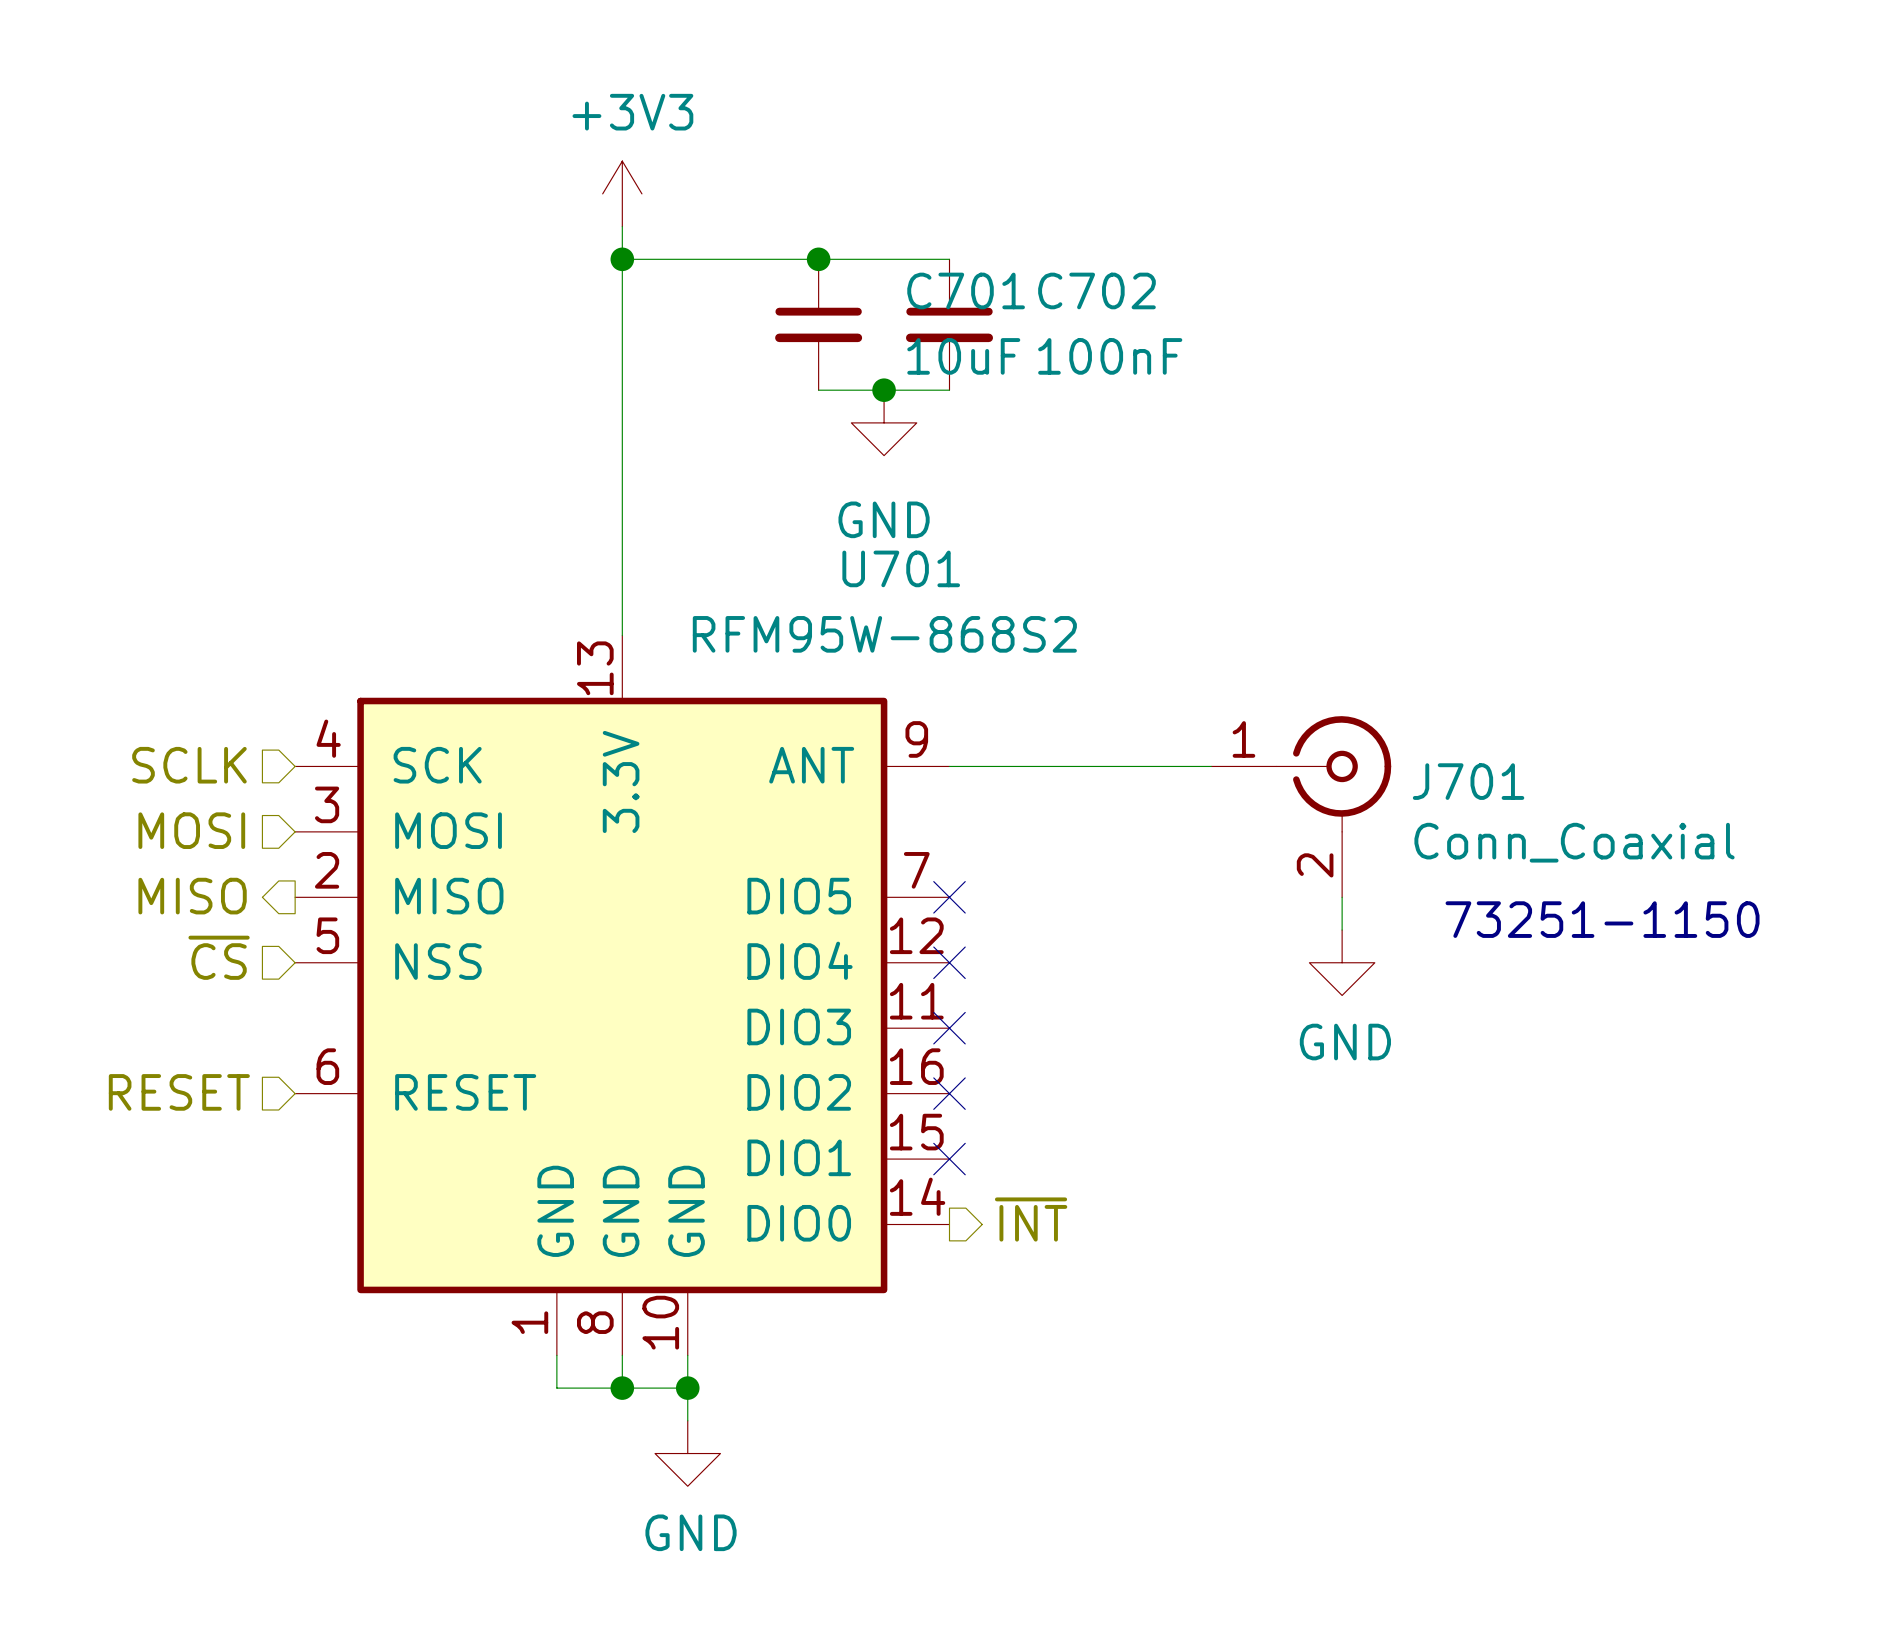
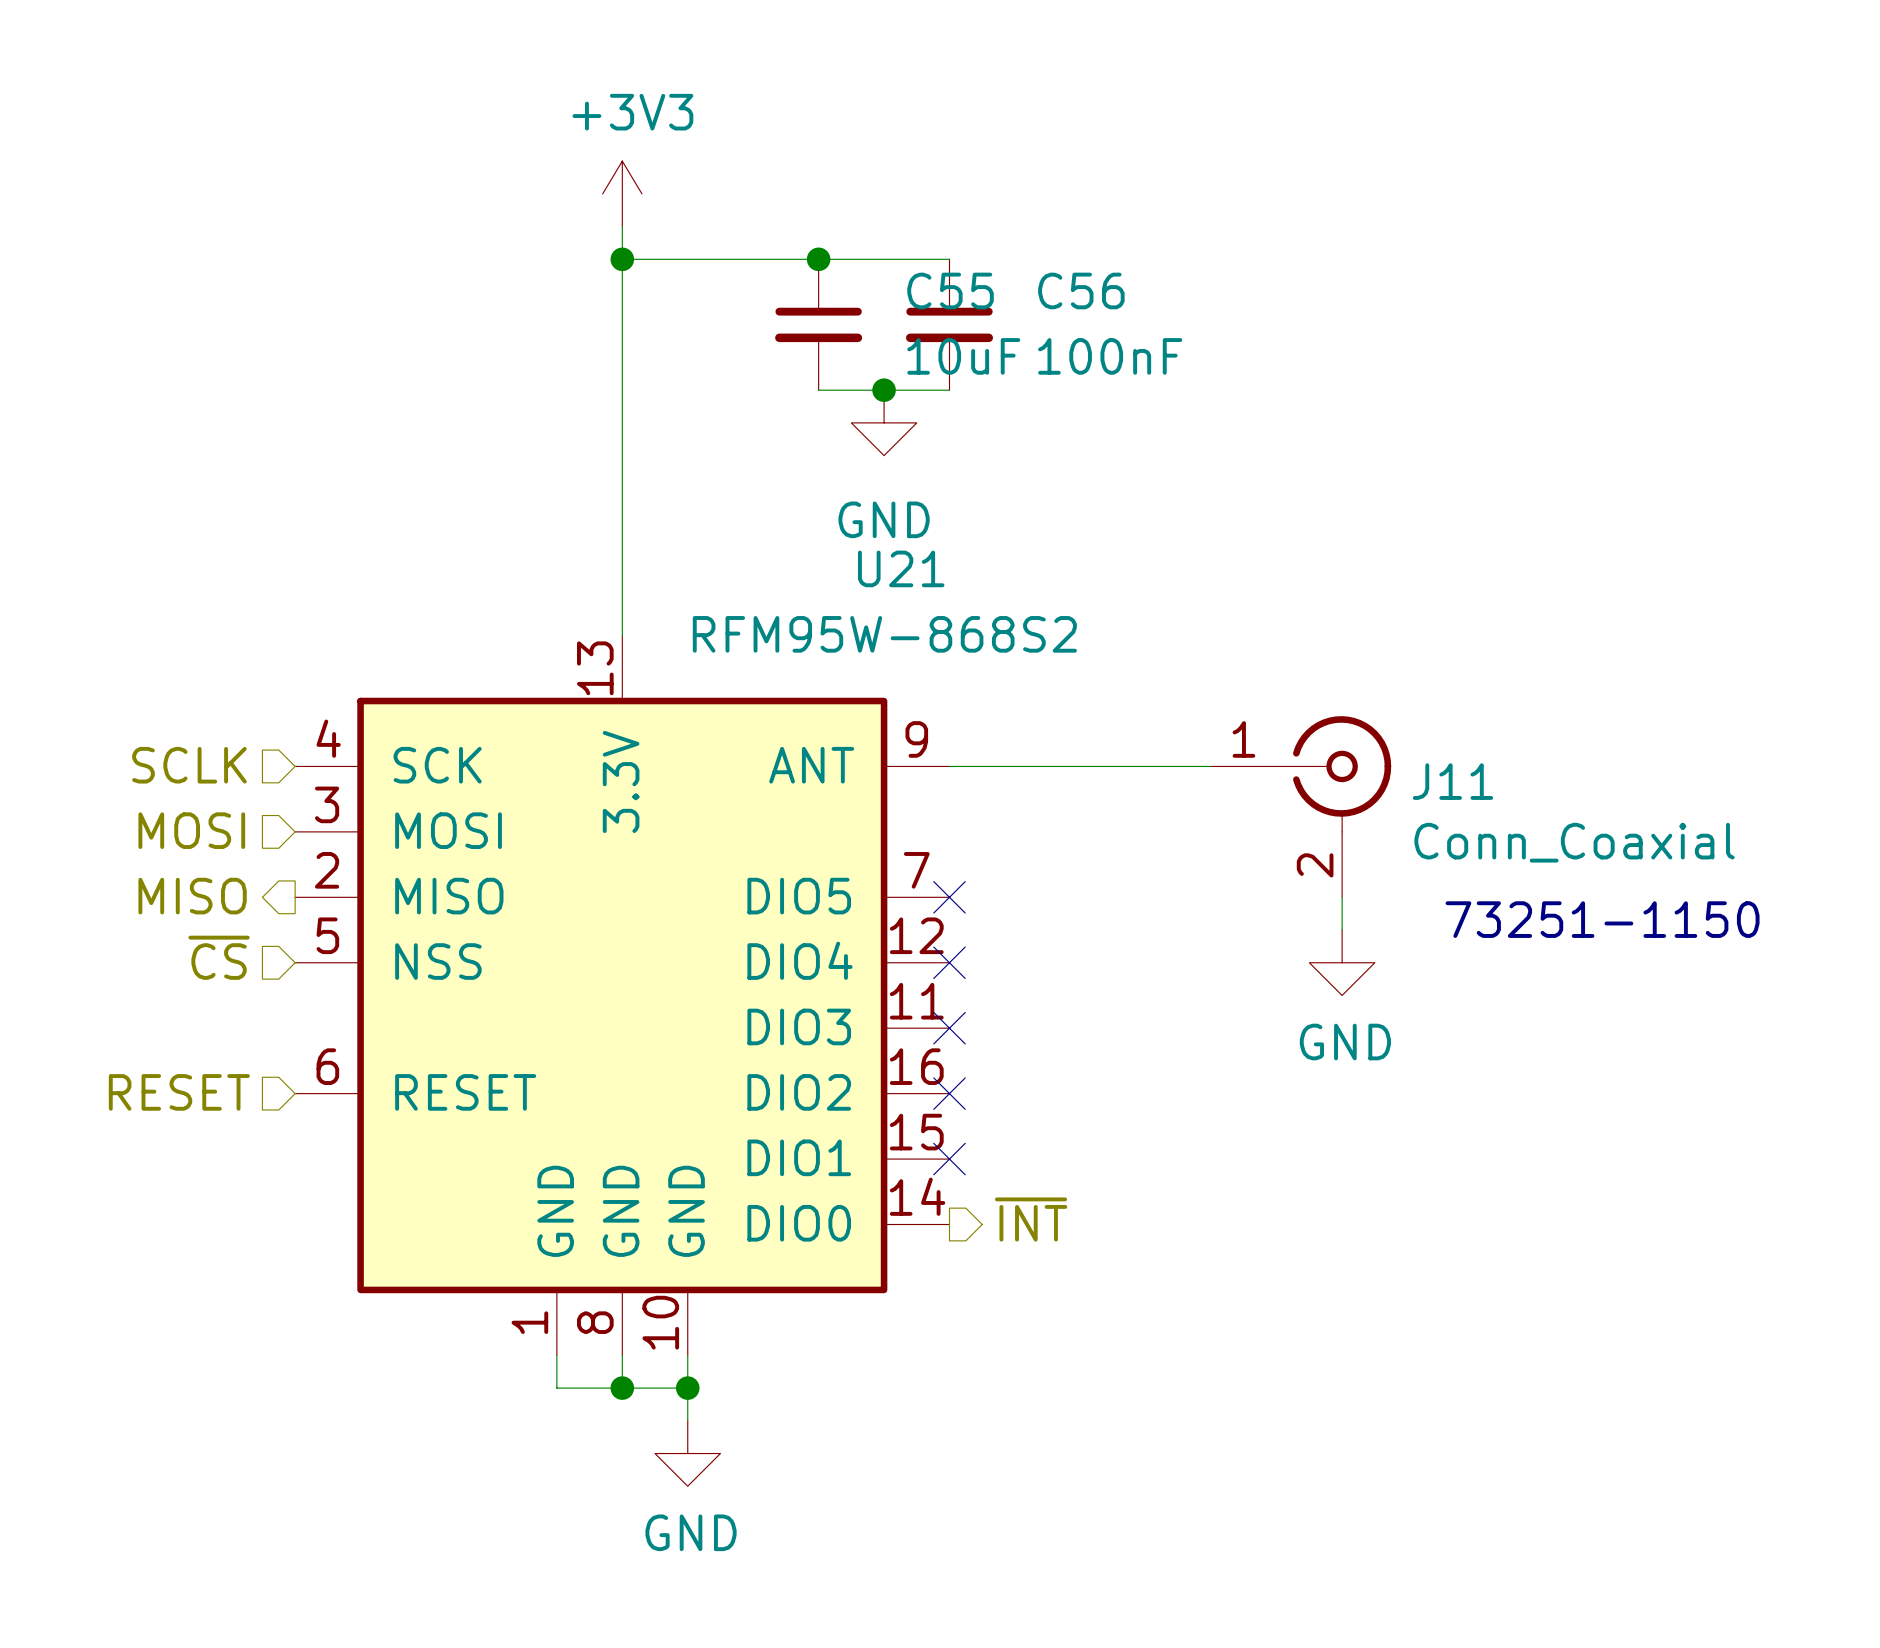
C701 name: C701 (966, 290) -> C55 (950, 290)
C702 name: C702 (1096, 290) -> C56 (1081, 290)
U701 name: U701 (901, 568) -> U21 (901, 568)
J701 name: J701 (1468, 781) -> J11 (1452, 781)

